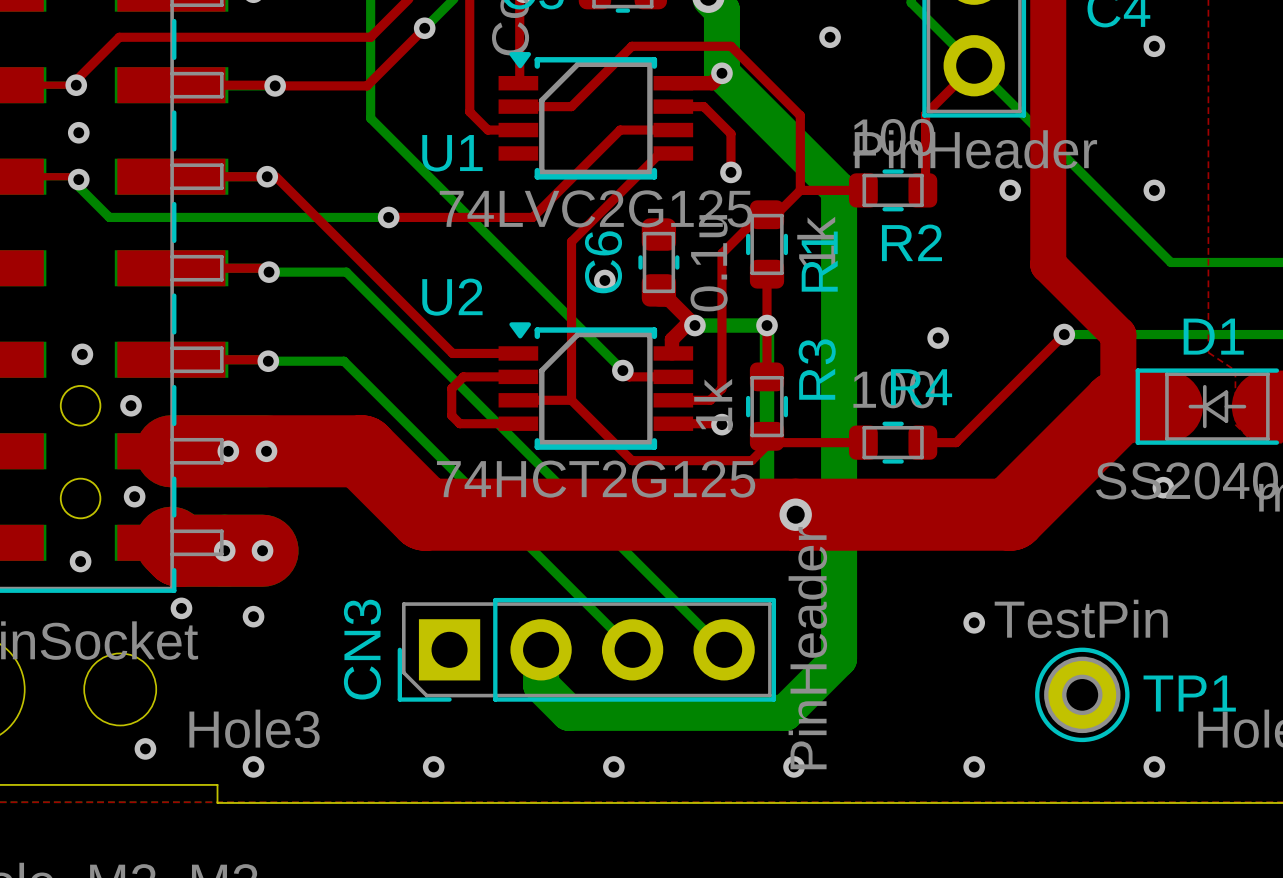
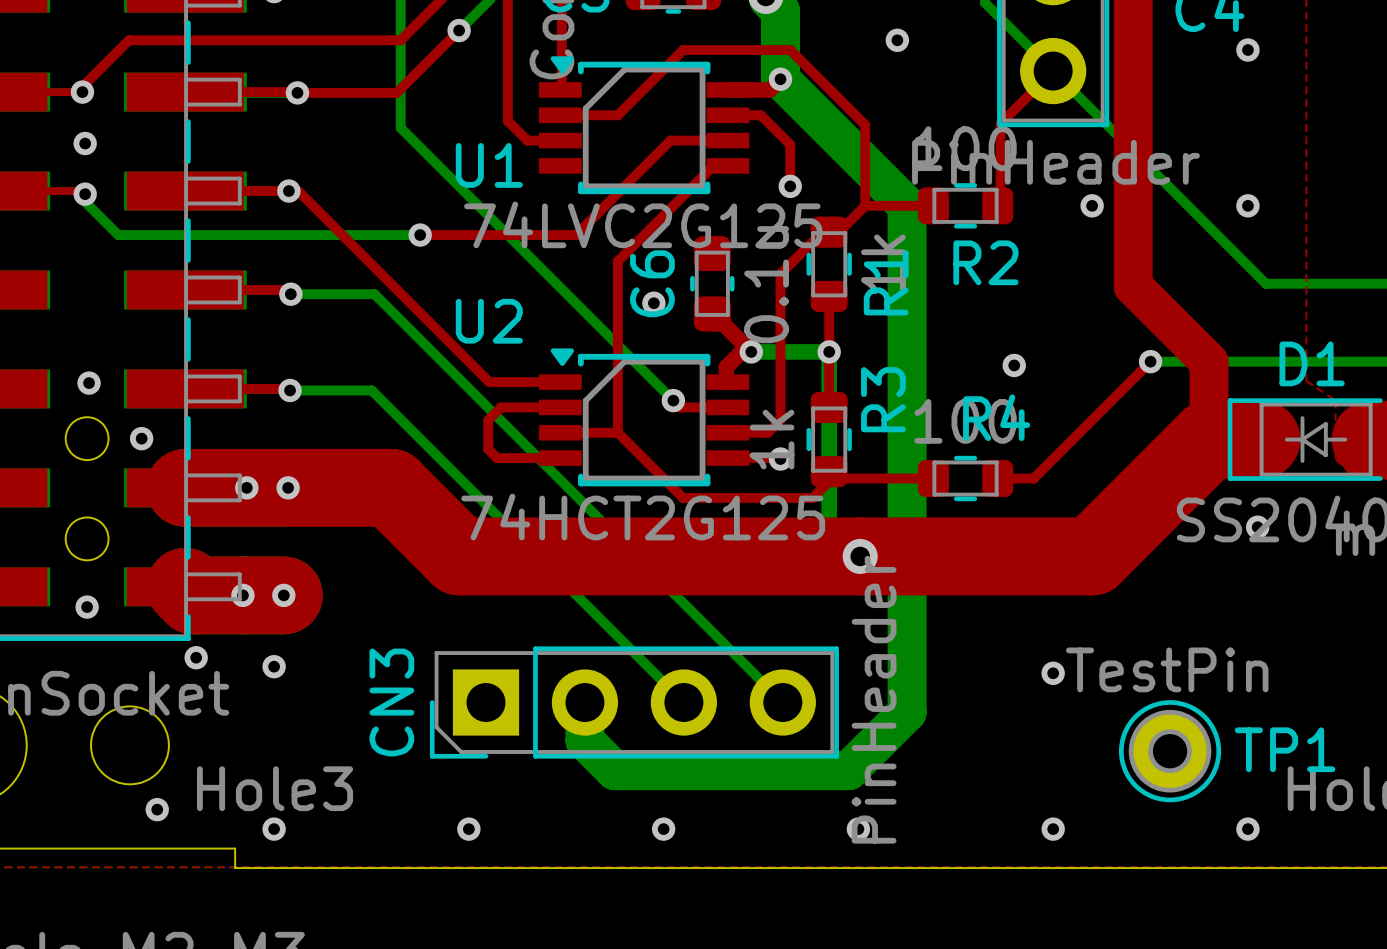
via: (134, 496) -> none

